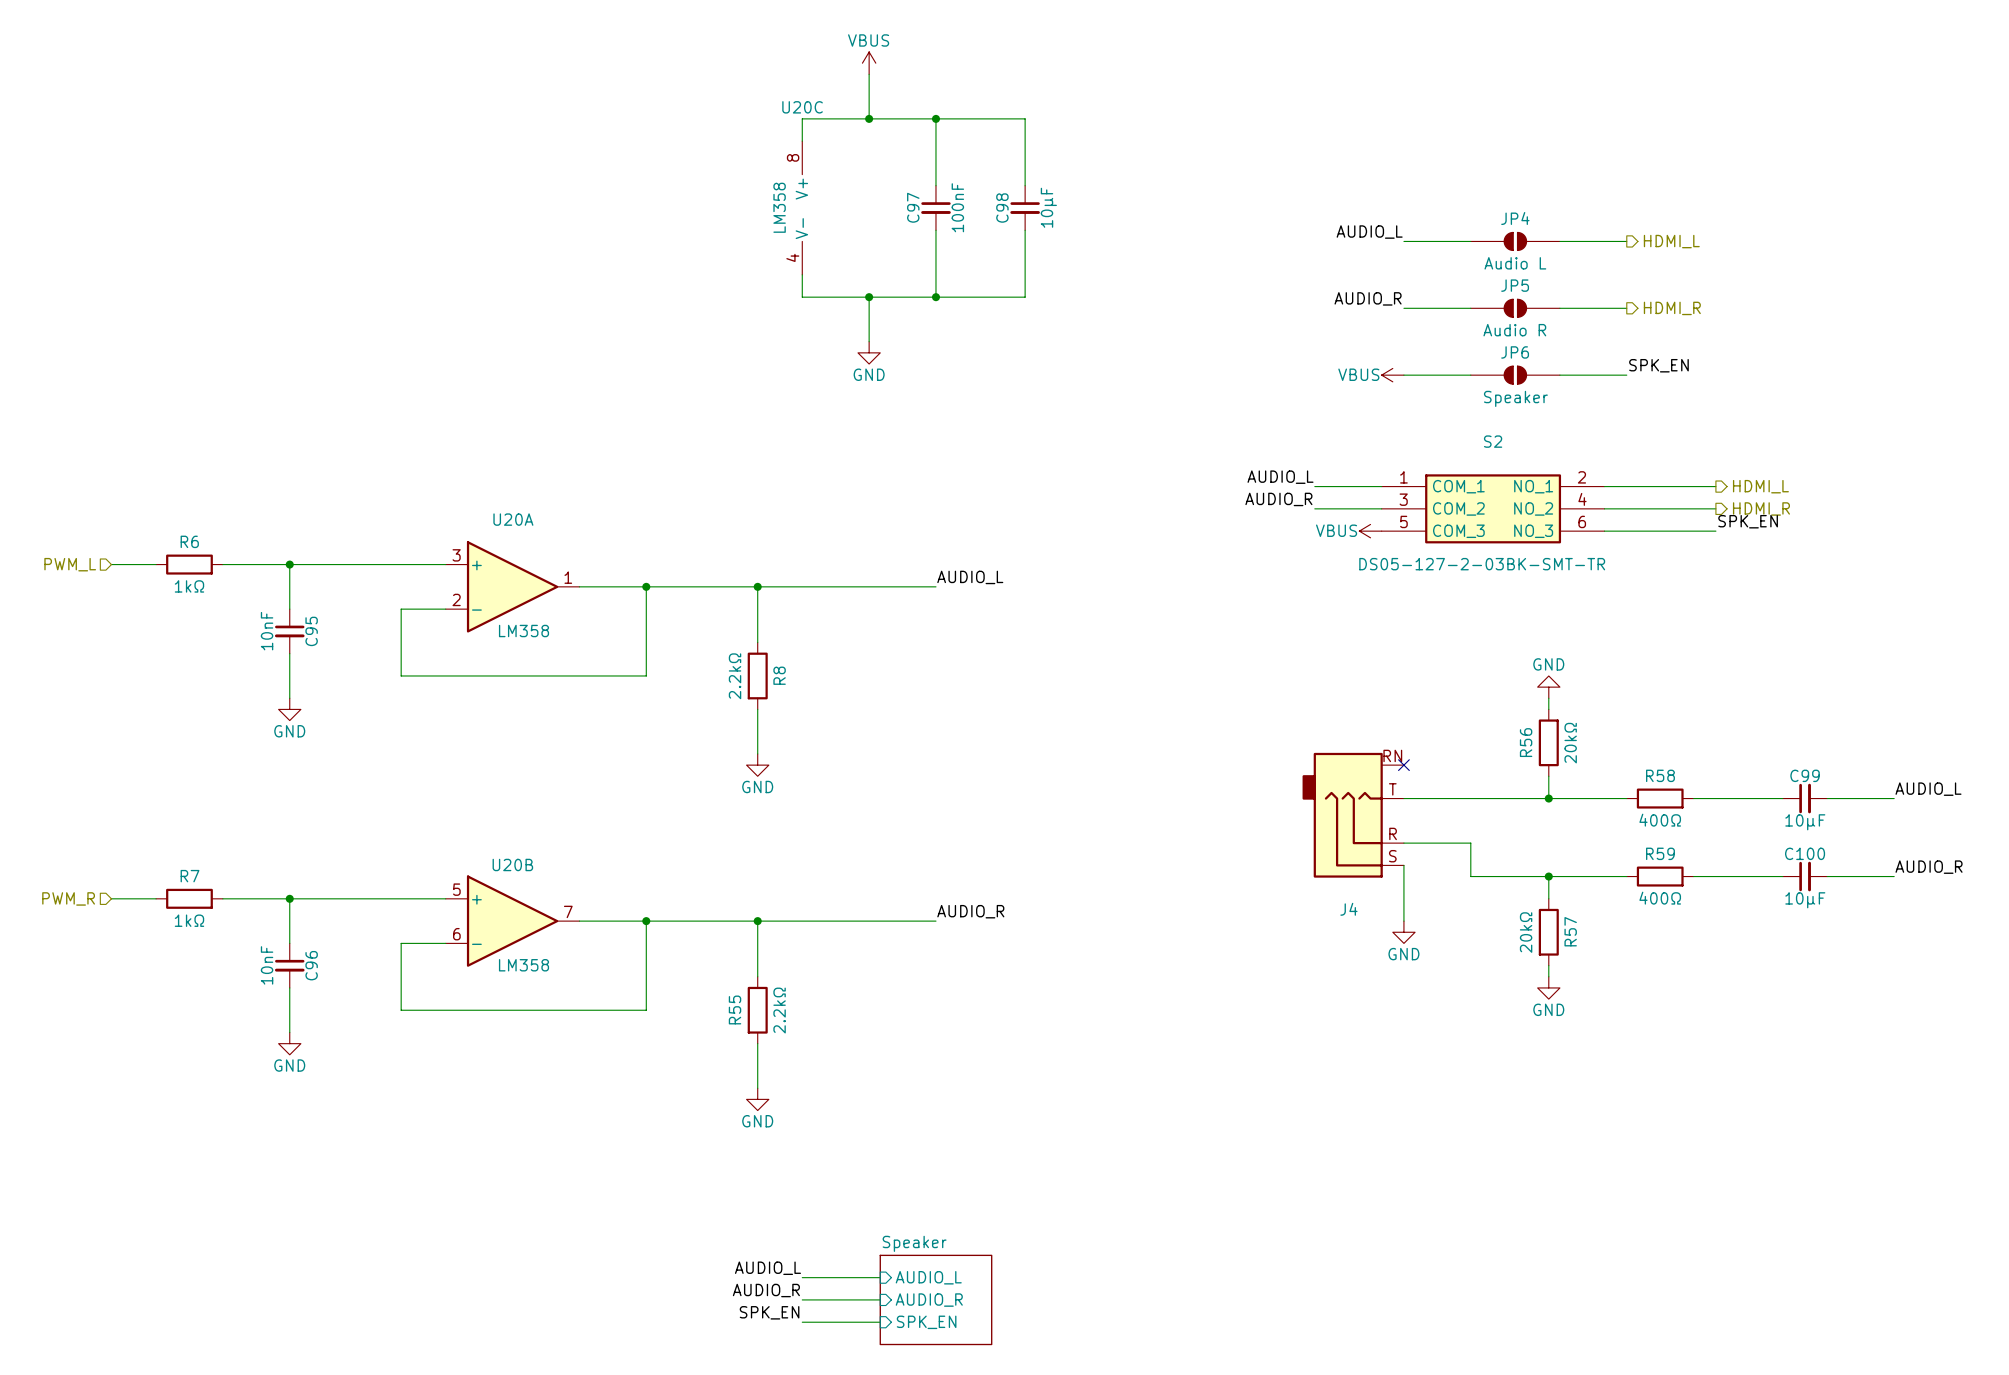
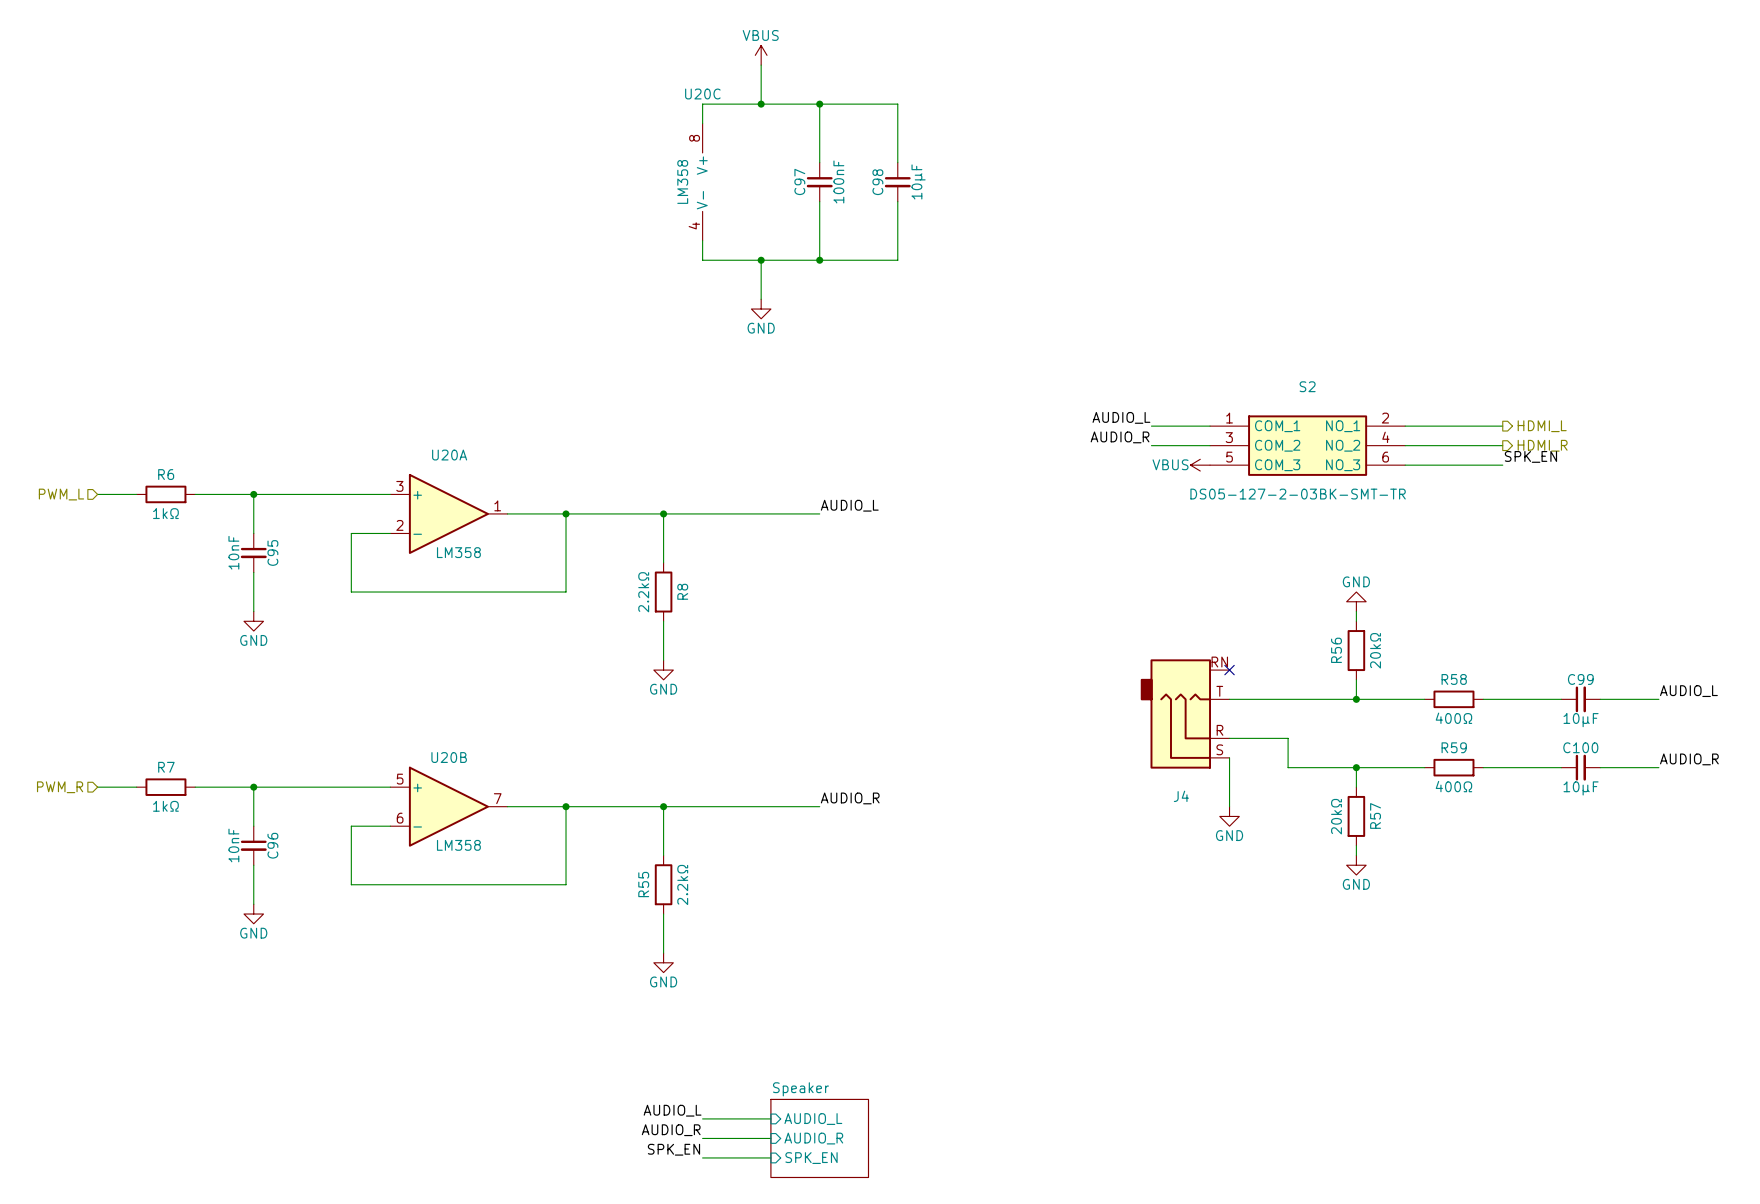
label: AUDIO_L (1369, 232) -> none
wire: (1403, 241) (1470, 241) -> none
JP4: Audio L (1515, 241) -> none
wire: (1559, 241) (1626, 241) -> none
hierarchical label: HDMI_L (1671, 241) -> none
label: AUDIO_R (1368, 298) -> none
wire: (1403, 308) (1470, 308) -> none
JP5: Audio R (1515, 308) -> none
wire: (1559, 308) (1626, 308) -> none
hierarchical label: HDMI_R (1672, 308) -> none
label: SPK_EN (1658, 365) -> none
power symbol: VBUS (1392, 375) -> none
wire: (1403, 375) (1470, 375) -> none
JP6: Speaker (1515, 375) -> none
wire: (1559, 375) (1626, 375) -> none

